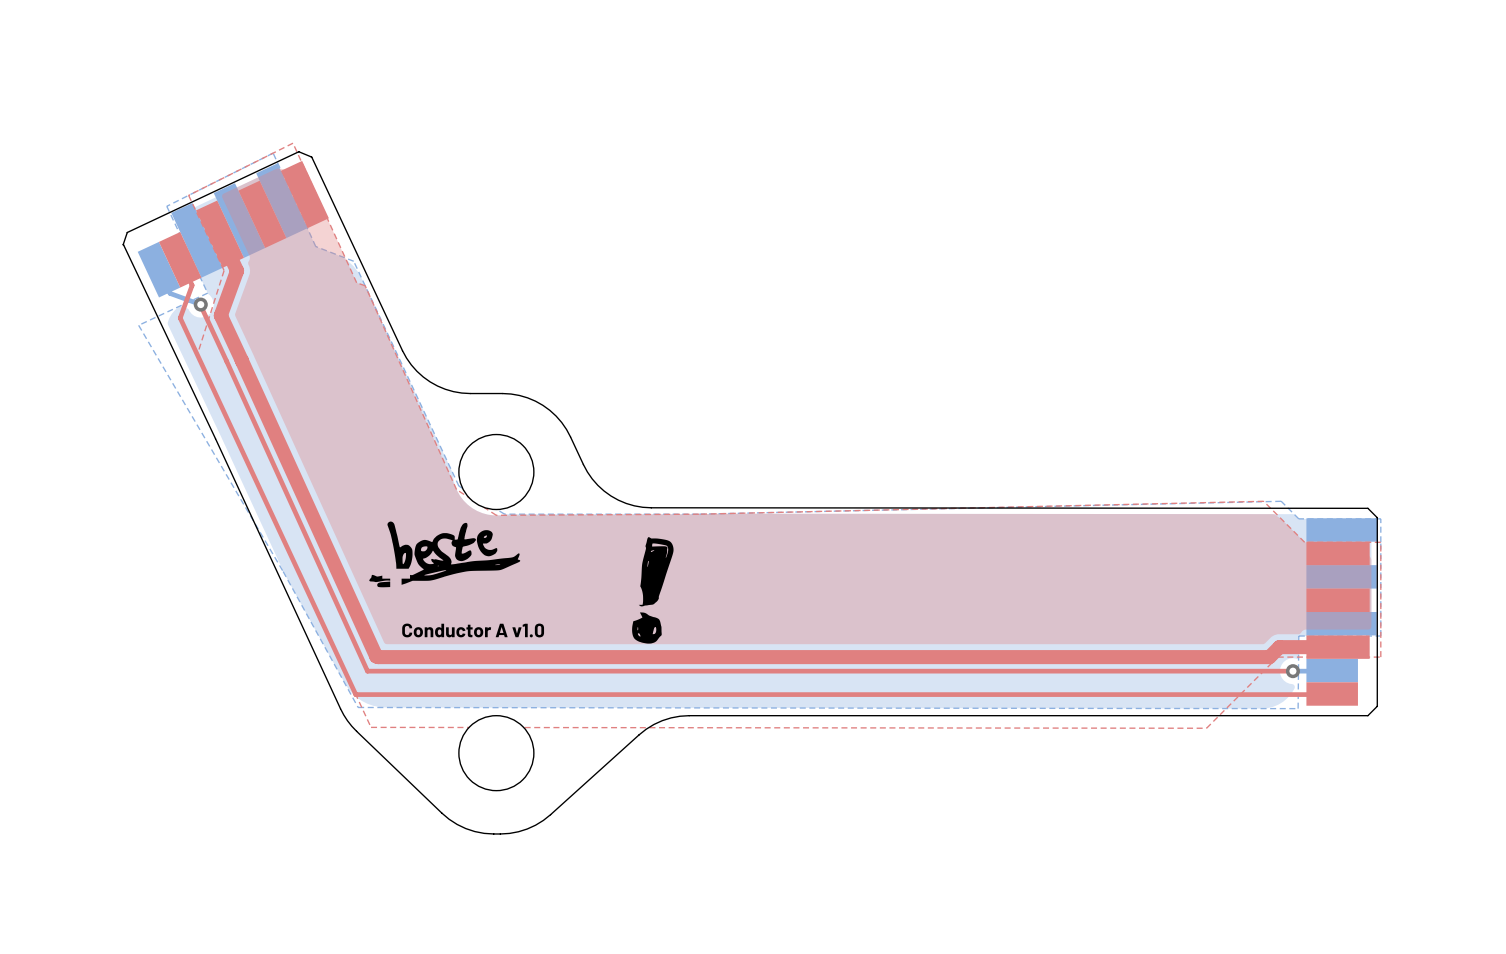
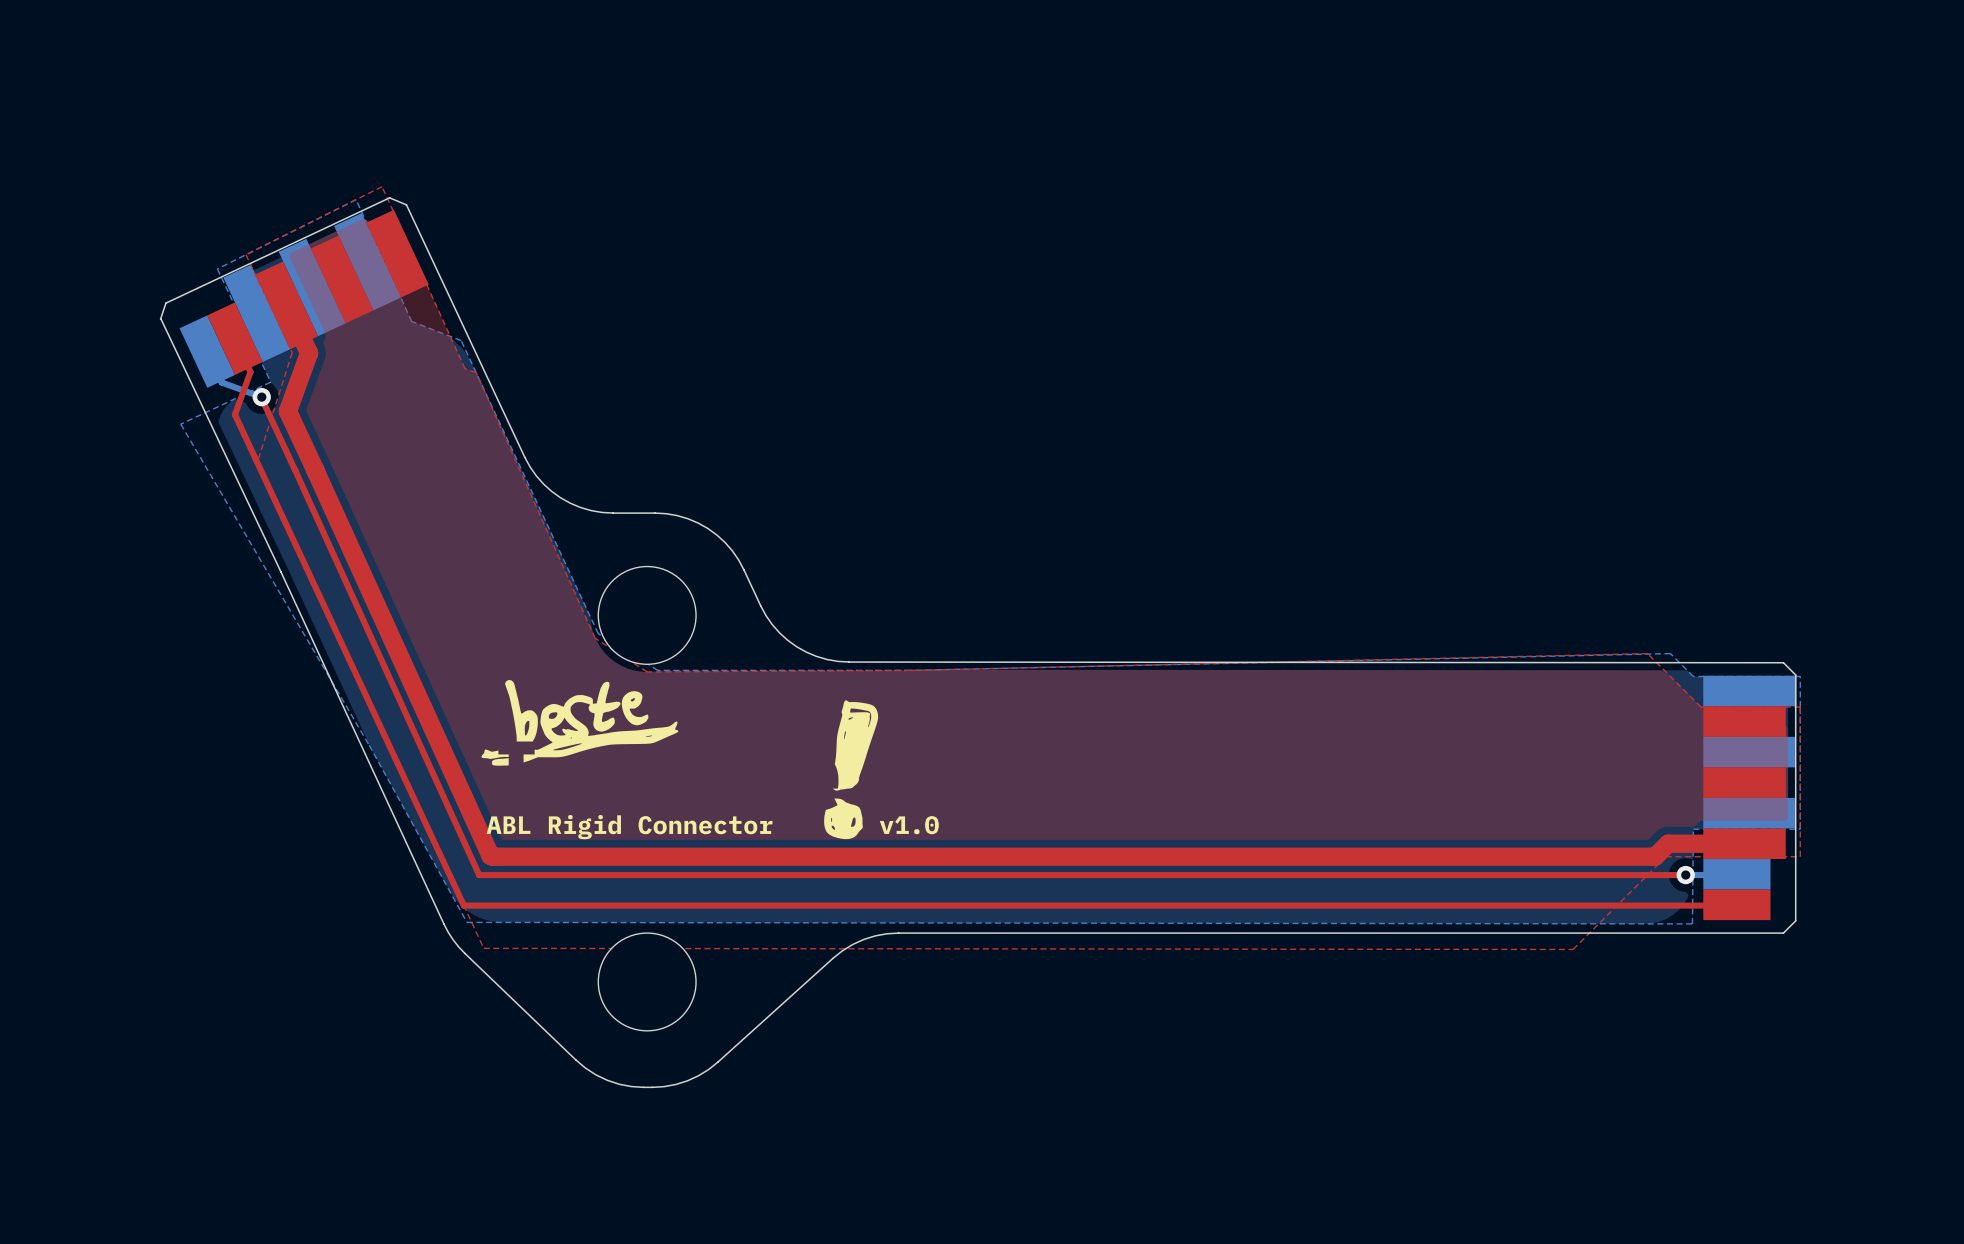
text: Conductor A v1.0 (473, 630) -> none
text: none -> ABL Rigid Connector v1.0 (712, 827)

